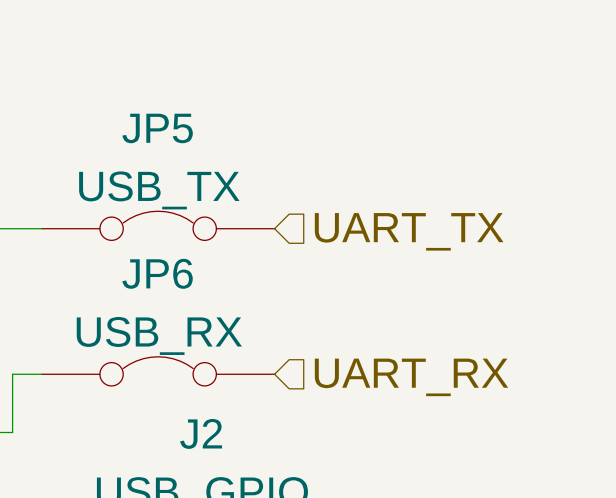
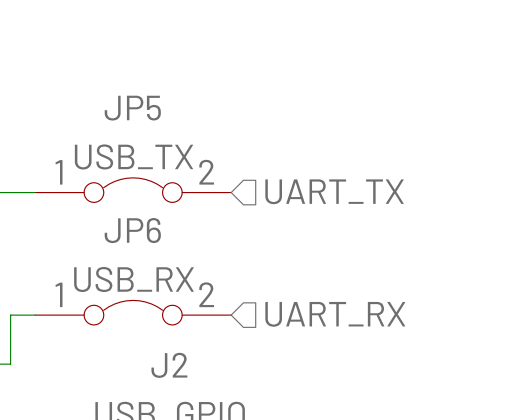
JP5 pin number: none -> 1 (59, 172)
JP5 pin number: none -> 2 (206, 172)
JP6 pin number: none -> 1 (59, 294)
JP6 pin number: none -> 2 (206, 294)

